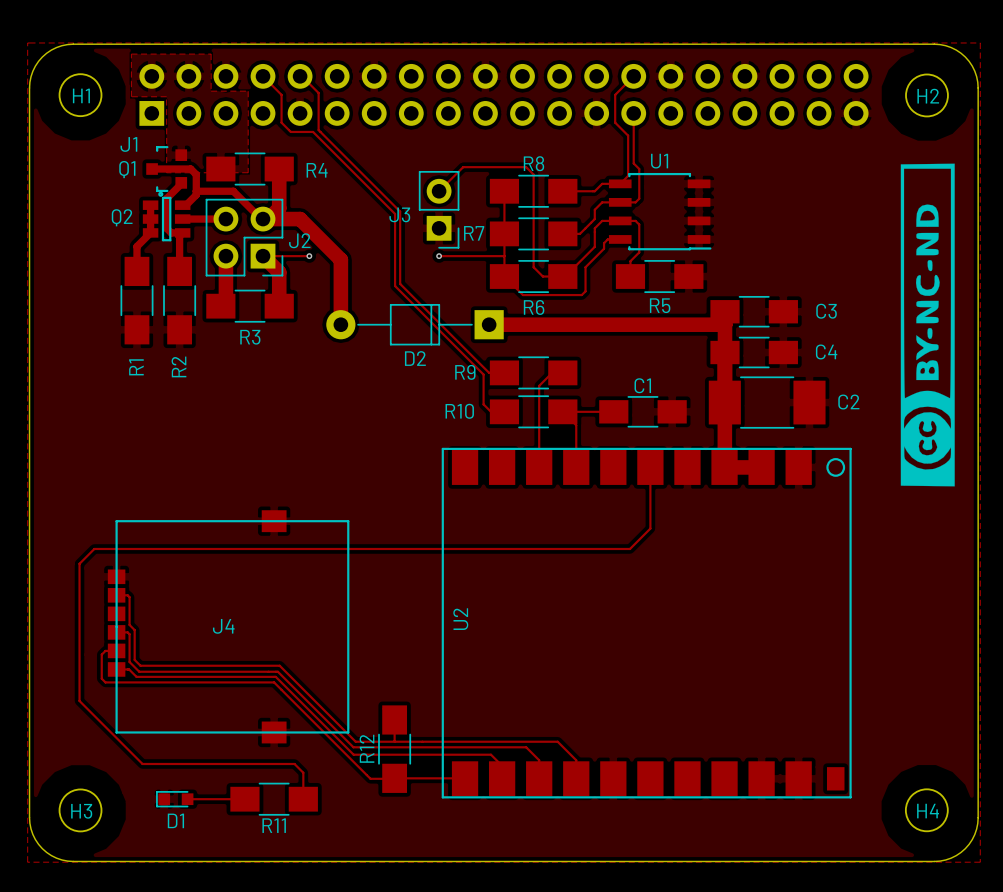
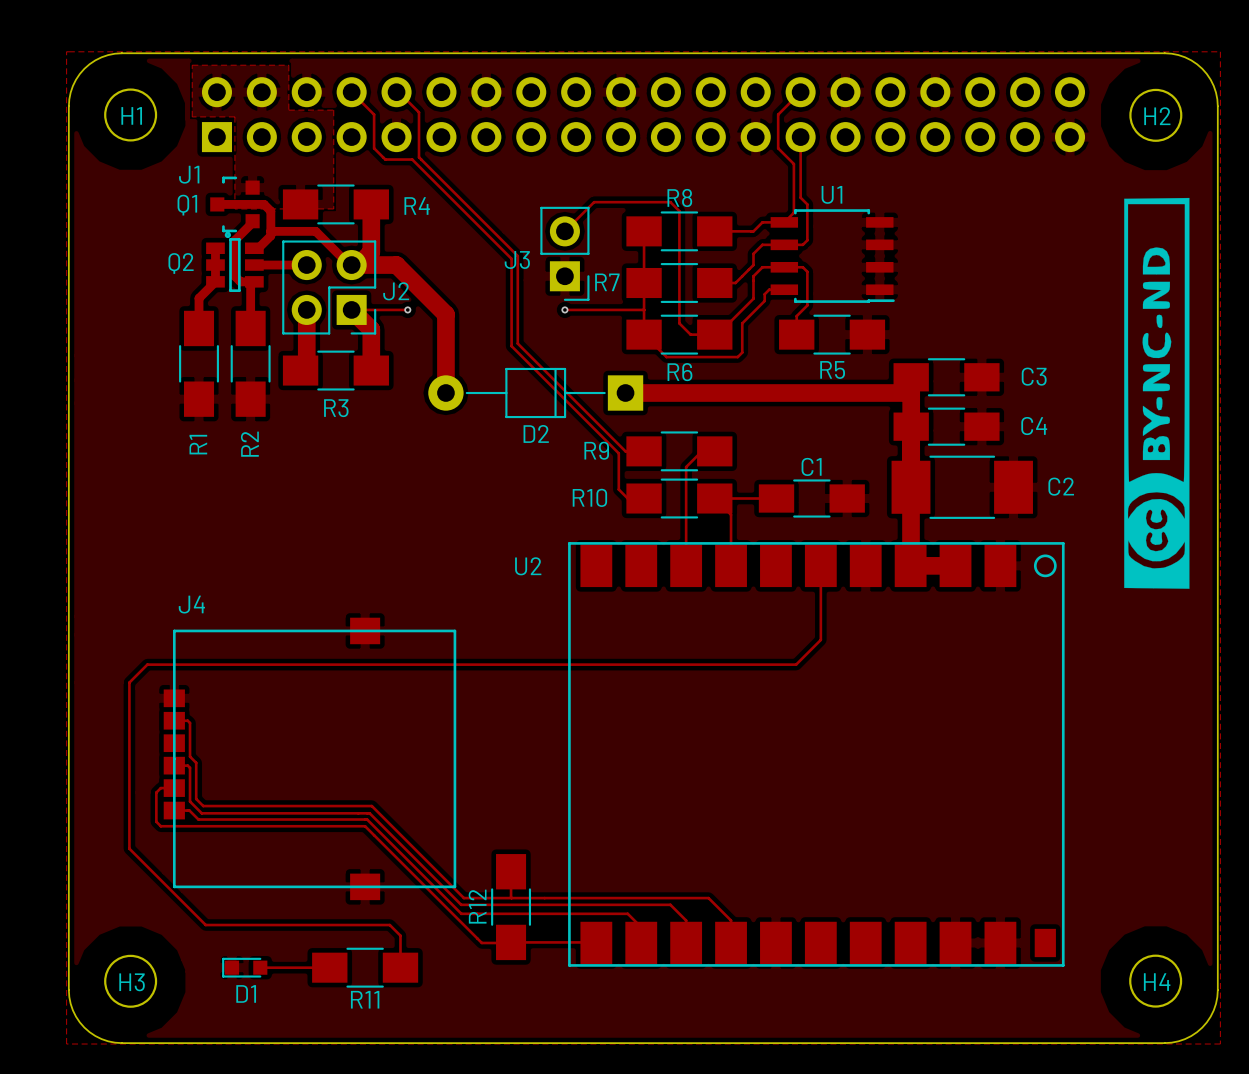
U2 name rotation: 0° (460, 619) -> 90° clockwise (528, 566)
U2 name position: U2 (460, 619) -> U2 (528, 566)
J4 name position: J4 (223, 626) -> J4 (191, 604)

